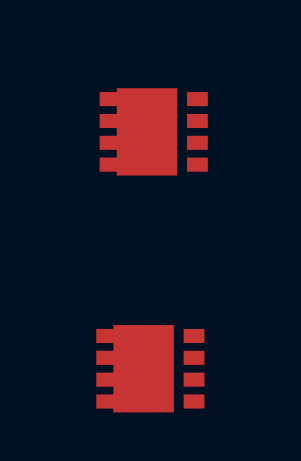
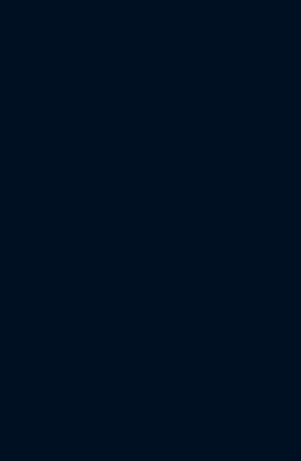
part: (153, 131) -> none
part: (150, 368) -> none

